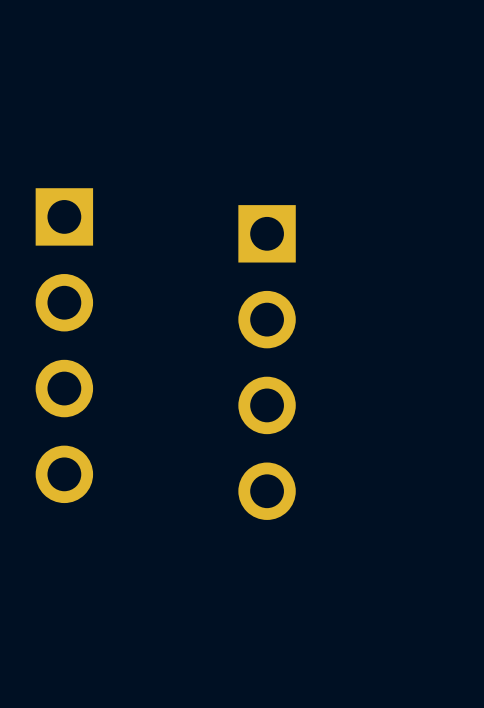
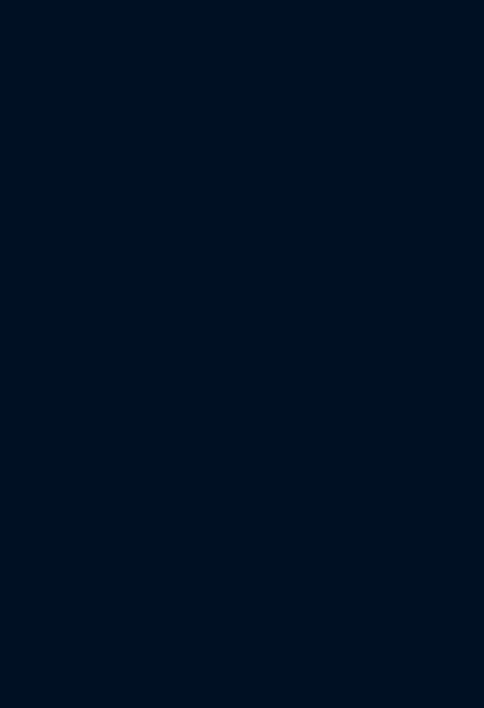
part: (64, 345) -> none
part: (267, 362) -> none

